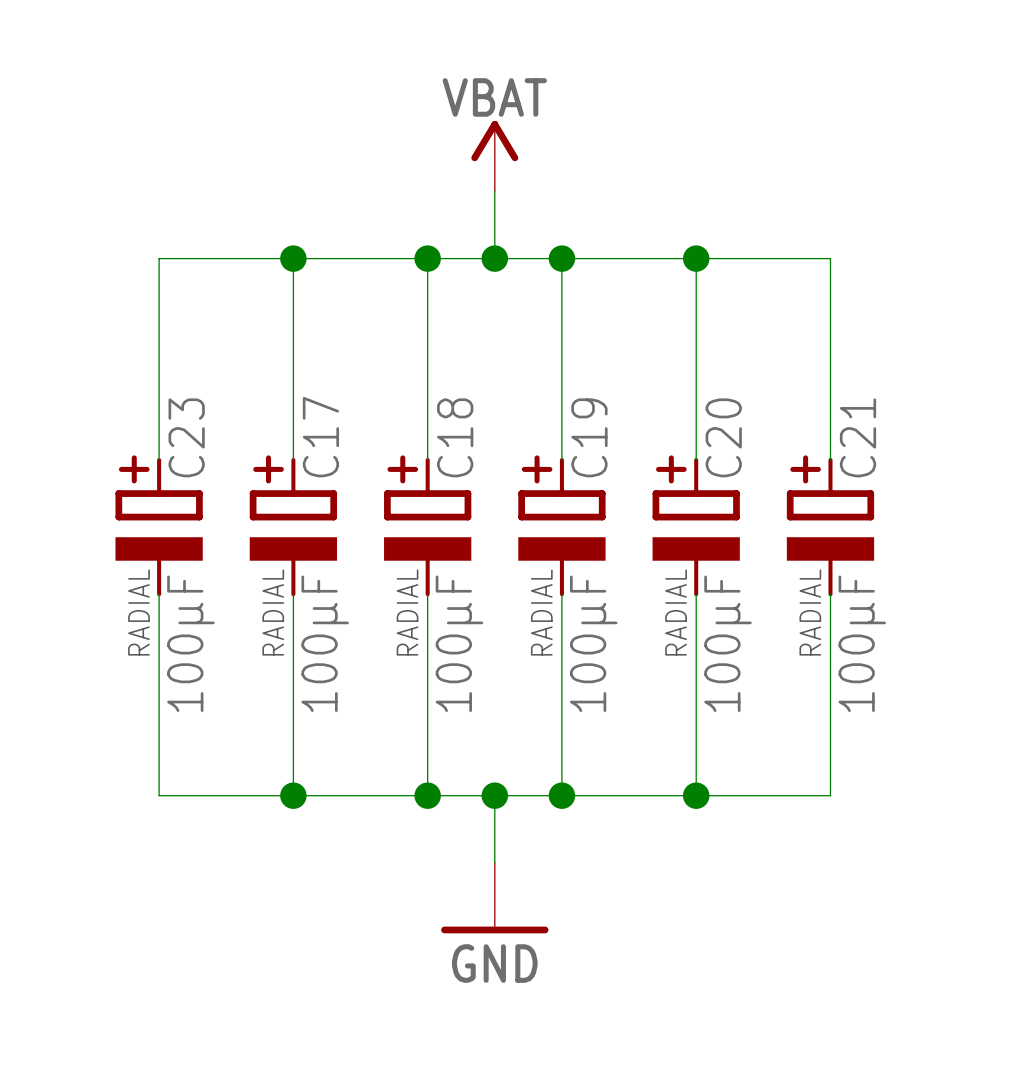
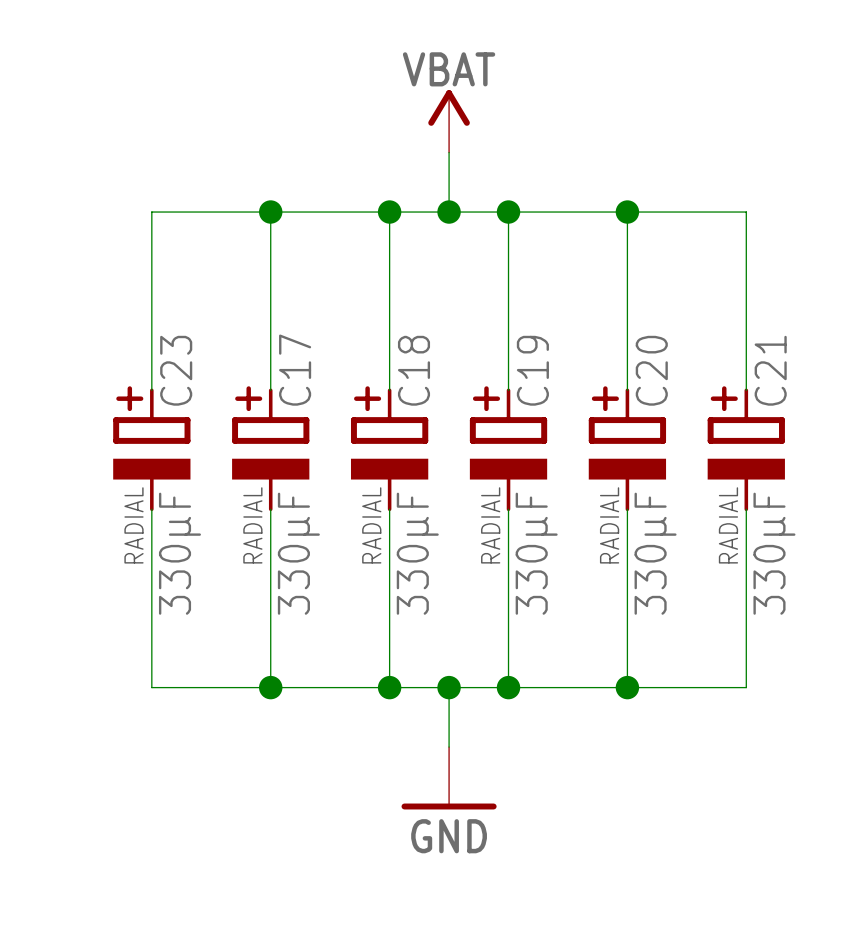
C23 value: 100µF (190, 643) -> 330µF (179, 553)
C17 value: 100µF (325, 643) -> 330µF (298, 553)
C18 value: 100µF (459, 643) -> 330µF (417, 553)
C19 value: 100µF (593, 643) -> 330µF (536, 553)
C20 value: 100µF (727, 643) -> 330µF (655, 553)
C21 value: 100µF (862, 643) -> 330µF (774, 553)

